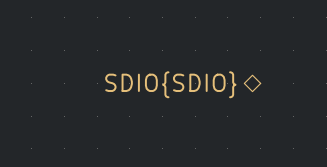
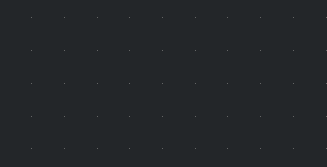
hierarchical label: SDIO{SDIO} (170, 84) -> none

